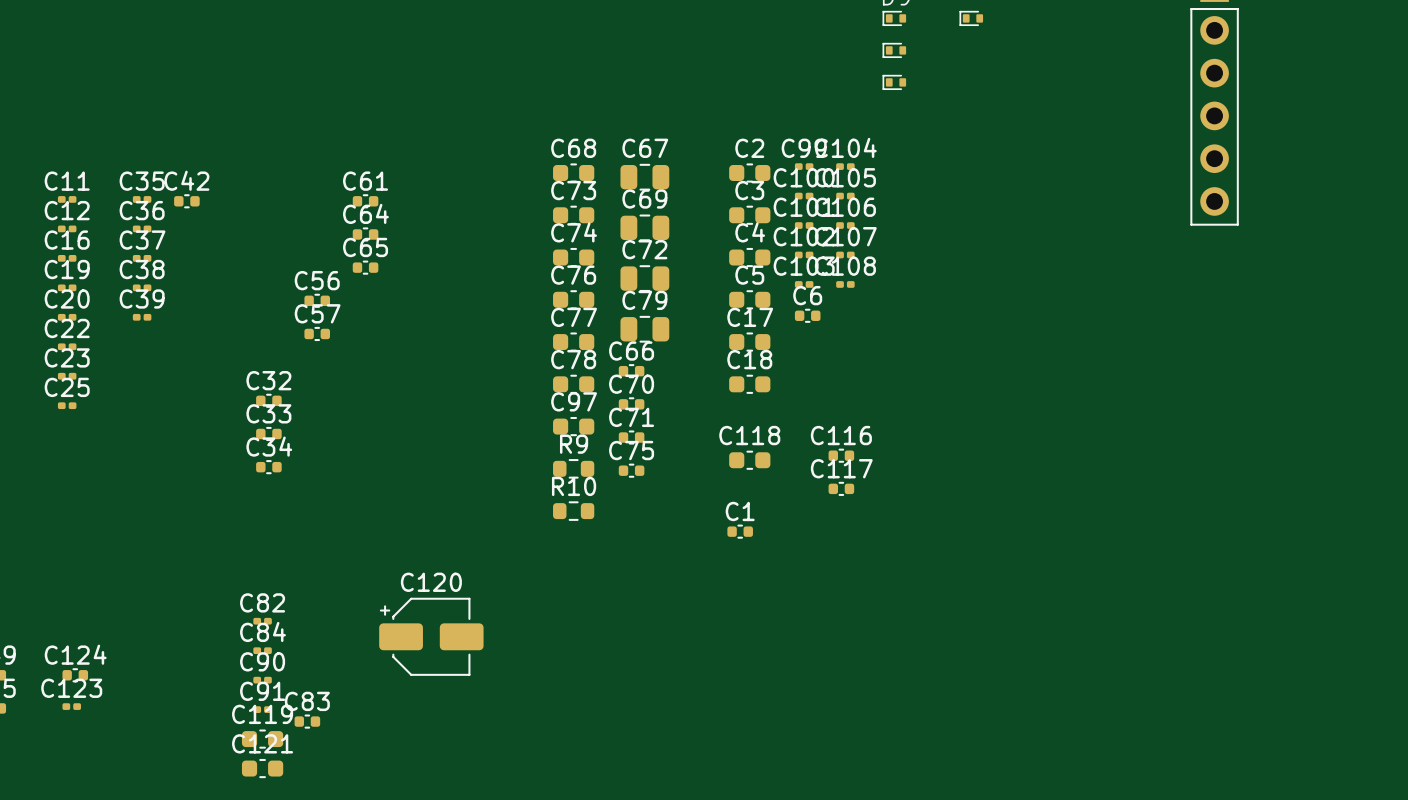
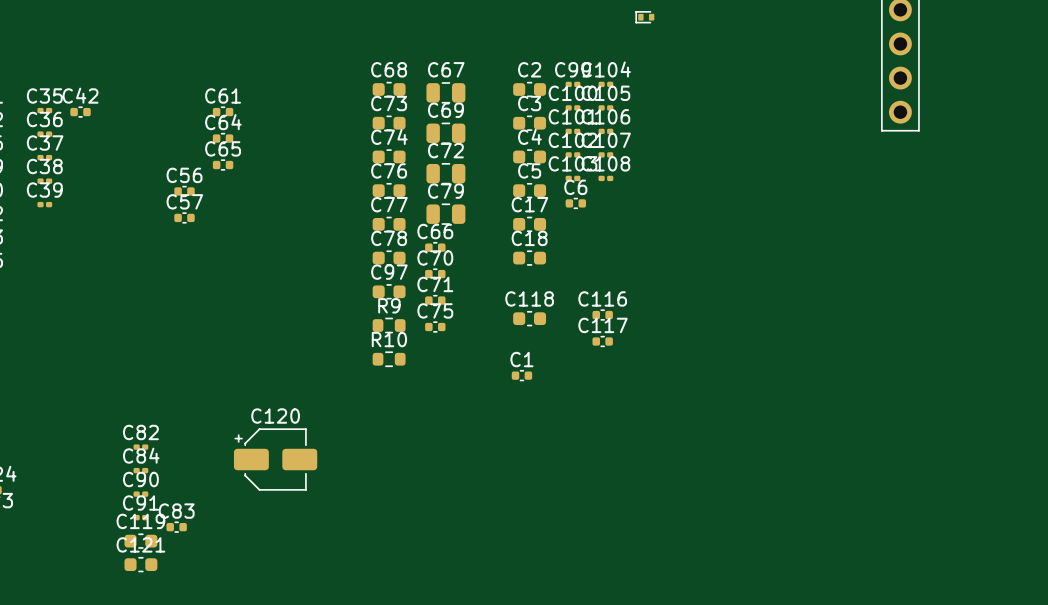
C32: (268, 400) -> none
C33: (268, 433) -> none
C34: (268, 467) -> none

